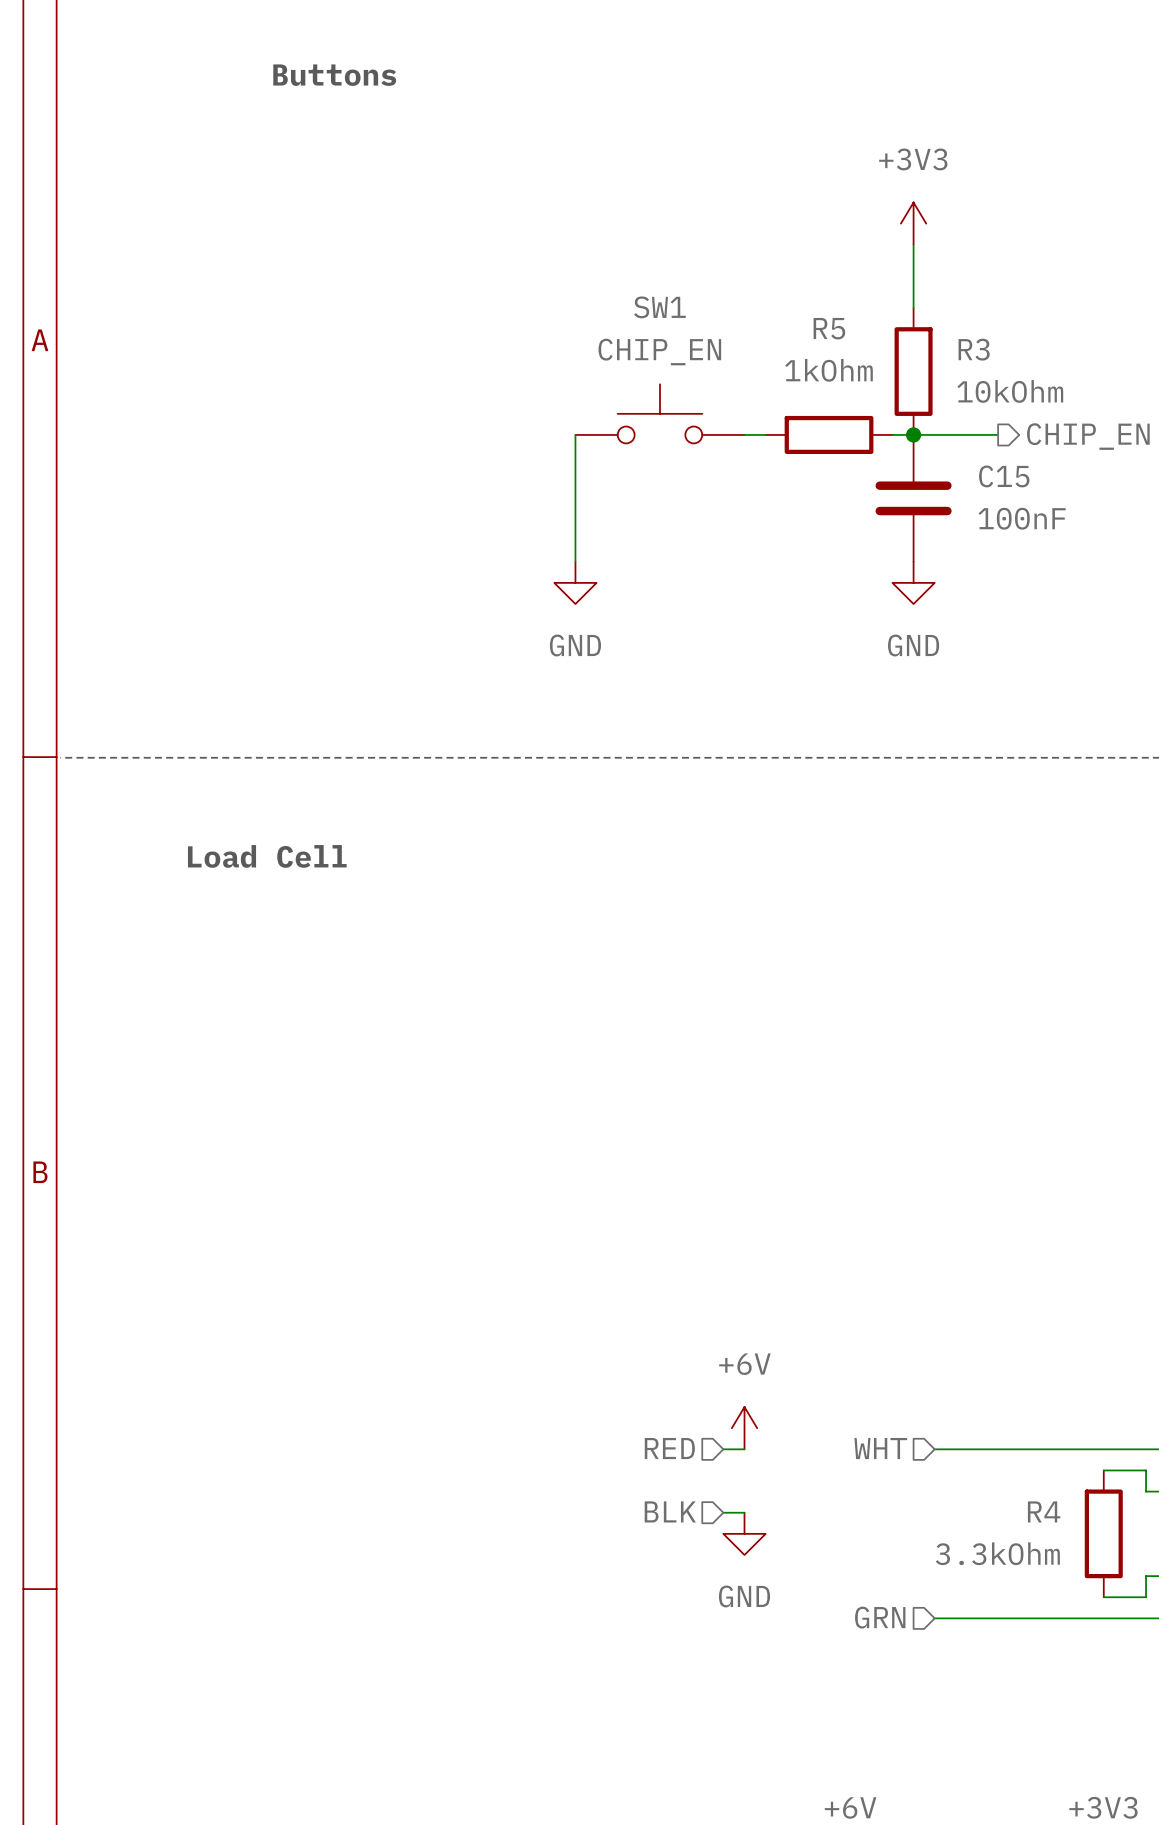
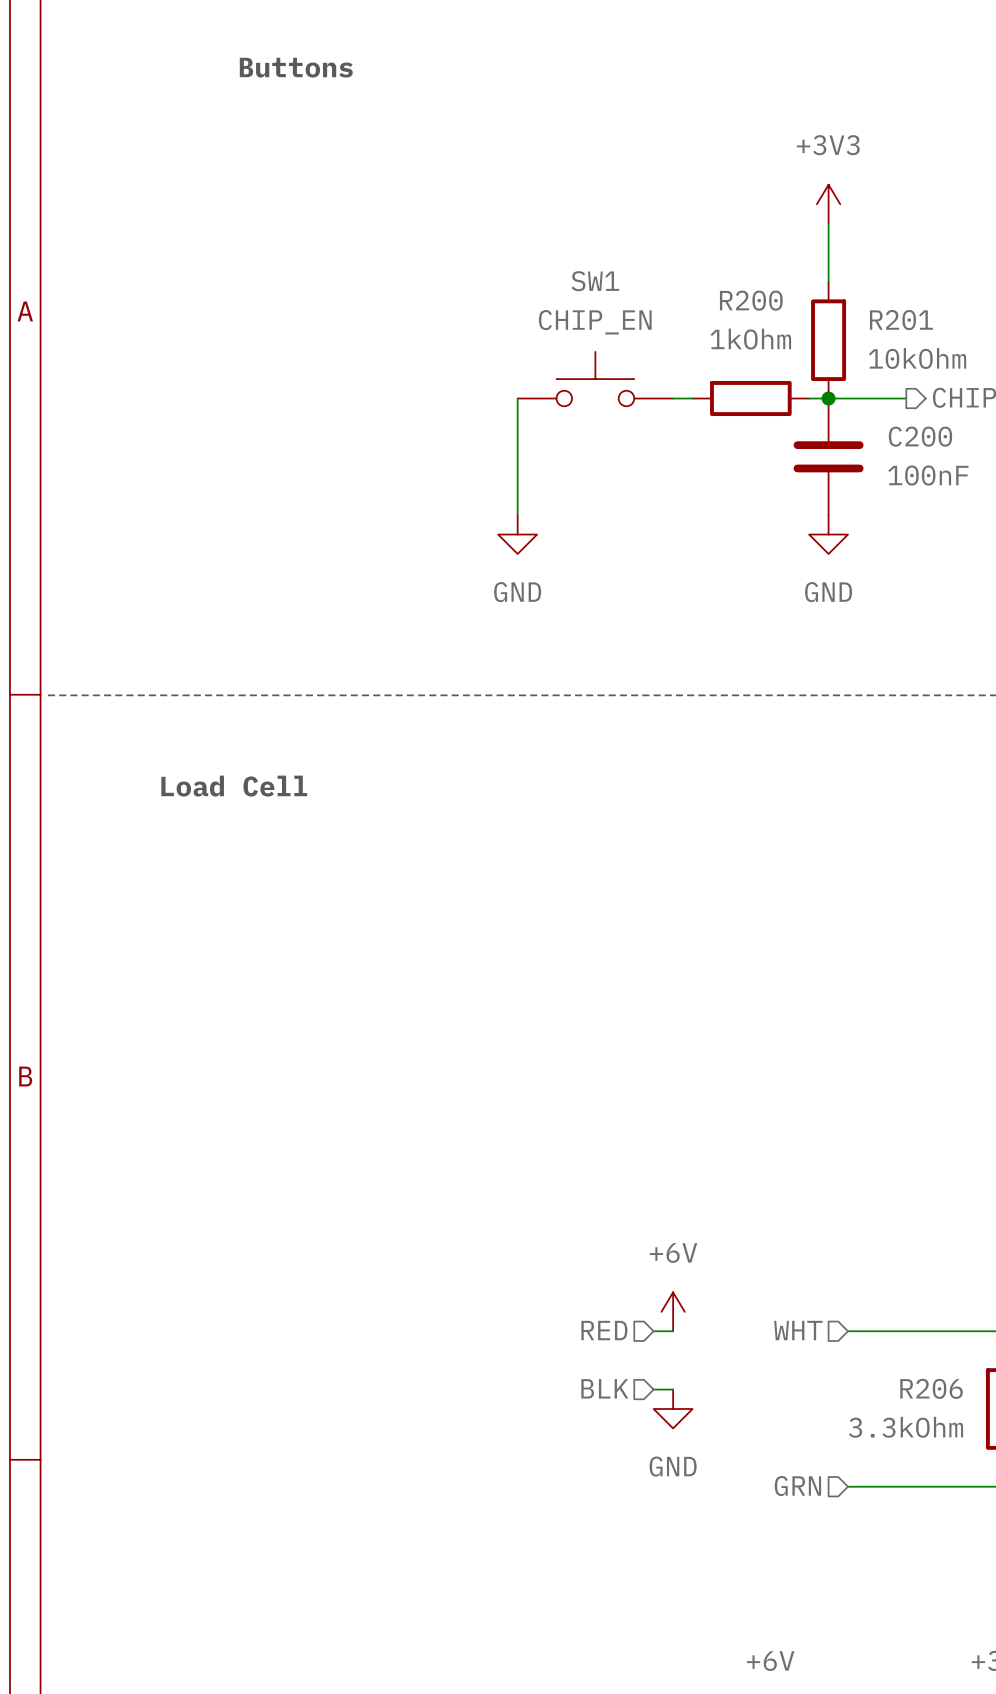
R5 name: R5 (829, 328) -> R200 (751, 300)
R3 name: R3 (974, 349) -> R201 (901, 320)
C15 name: C15 (1004, 476) -> C200 (920, 436)
R4 name: R4 (1044, 1511) -> R206 (931, 1388)

